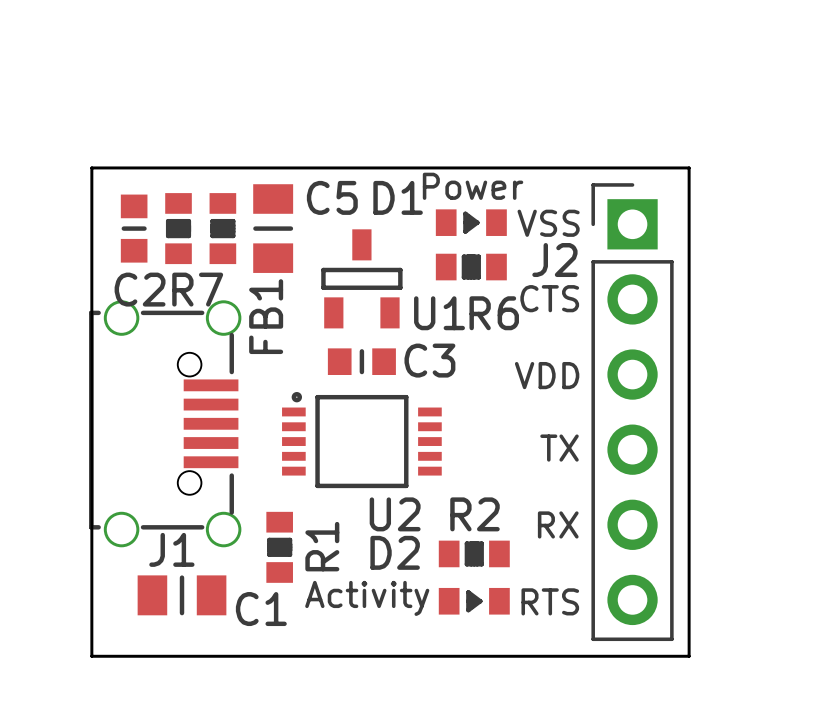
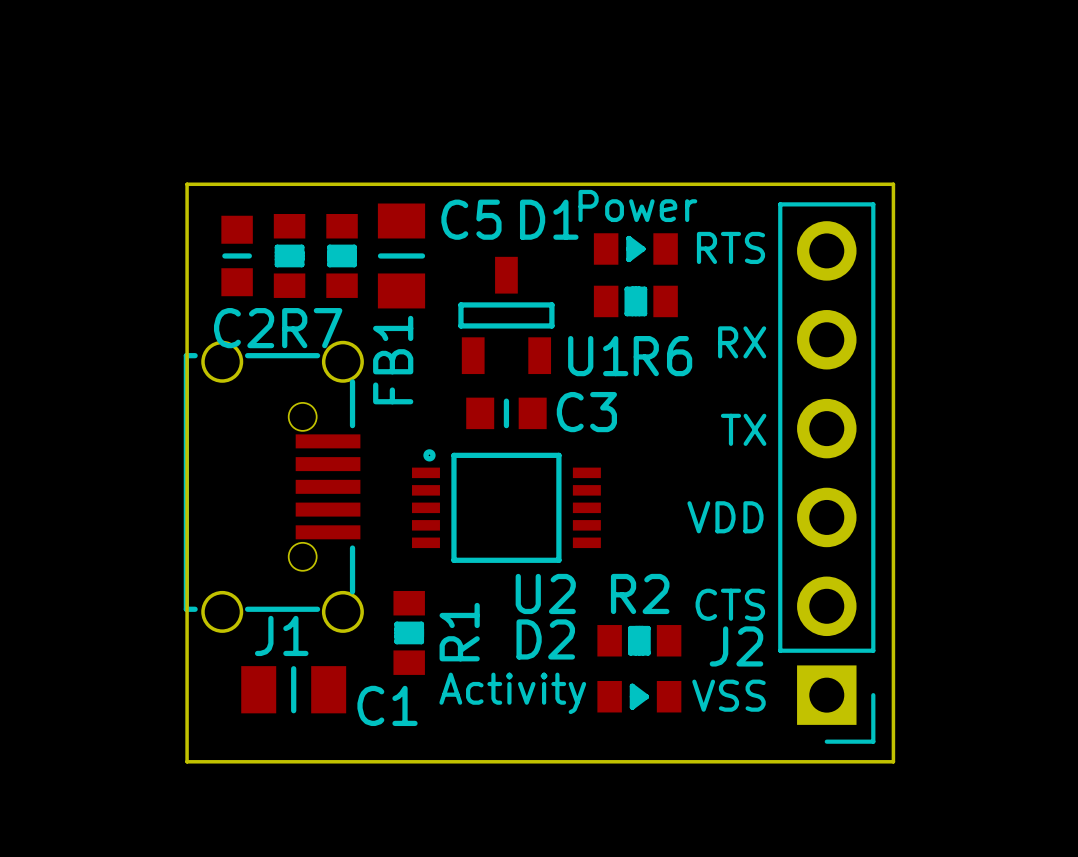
text: VSS (548, 223) -> RTS (730, 247)
J2 name position: J2 (554, 260) -> J2 (736, 646)
text: CTS (549, 298) -> RX (742, 342)
text: VDD (547, 375) -> TX (743, 429)
J2 rotation: 0° (632, 412) -> 180° (826, 473)
text: TX (559, 448) -> VDD (725, 517)
text: RX (558, 524) -> CTS (730, 604)
text: RTS (550, 601) -> VSS (728, 695)

